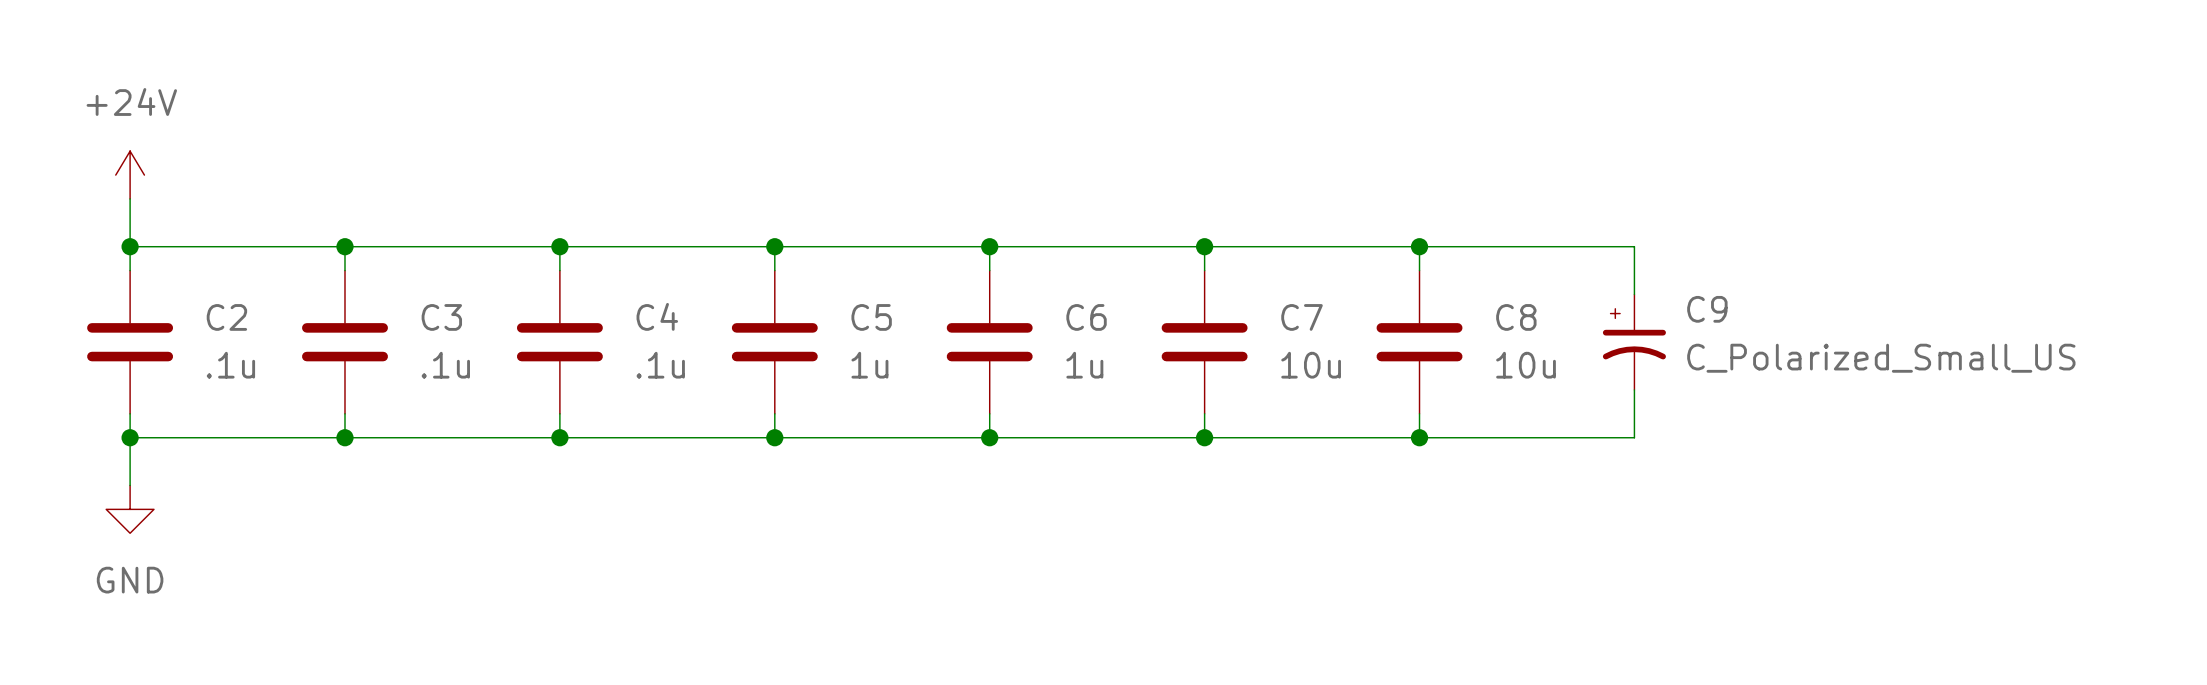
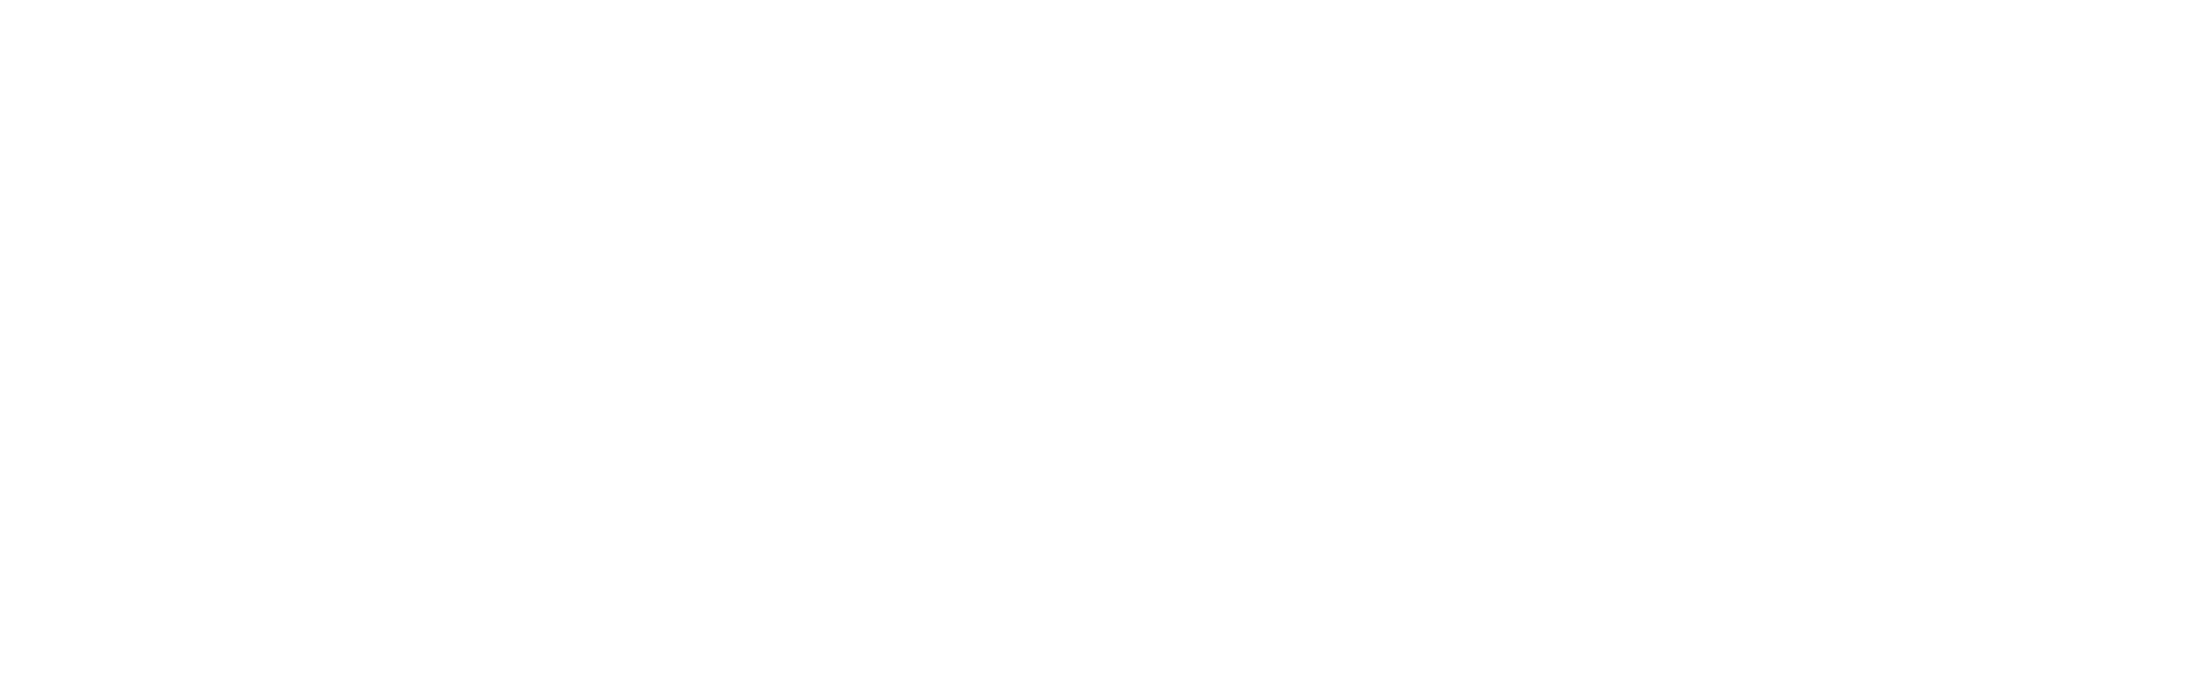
power symbol: +24V (130, 175) -> none
wire: (130, 198) (130, 270) -> none
wire: (130, 246) (1634, 246) (1634, 294) -> none
junction: (130, 246) -> none
wire: (344, 246) (344, 270) -> none
junction: (344, 246) -> none
wire: (559, 246) (559, 270) -> none
junction: (559, 246) -> none
wire: (774, 246) (774, 270) -> none
junction: (774, 246) -> none
wire: (989, 246) (989, 270) -> none
junction: (989, 246) -> none
wire: (1204, 246) (1204, 270) -> none
junction: (1204, 246) -> none
wire: (1419, 246) (1419, 270) -> none
junction: (1419, 246) -> none
C2: .1u (130, 342) -> none
C3: .1u (344, 342) -> none
C4: .1u (559, 342) -> none
C5: 1u (774, 342) -> none
C6: 1u (989, 342) -> none
C7: 10u (1204, 342) -> none
C8: 10u (1419, 342) -> none
C9: C_Polarized_Small_US (1634, 342) -> none
wire: (1634, 389) (1634, 437) (130, 437) -> none
wire: (130, 413) (130, 485) -> none
wire: (344, 413) (344, 437) -> none
wire: (559, 413) (559, 437) -> none
wire: (774, 413) (774, 437) -> none
wire: (989, 413) (989, 437) -> none
wire: (1204, 413) (1204, 437) -> none
wire: (1419, 413) (1419, 437) -> none
junction: (130, 437) -> none
junction: (344, 437) -> none
junction: (559, 437) -> none
junction: (774, 437) -> none
junction: (989, 437) -> none
junction: (1204, 437) -> none
junction: (1419, 437) -> none
power symbol: GND (130, 509) -> none

